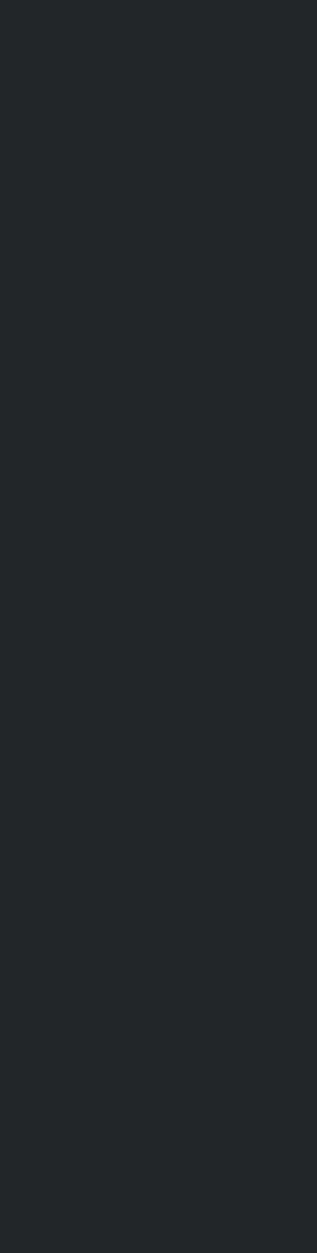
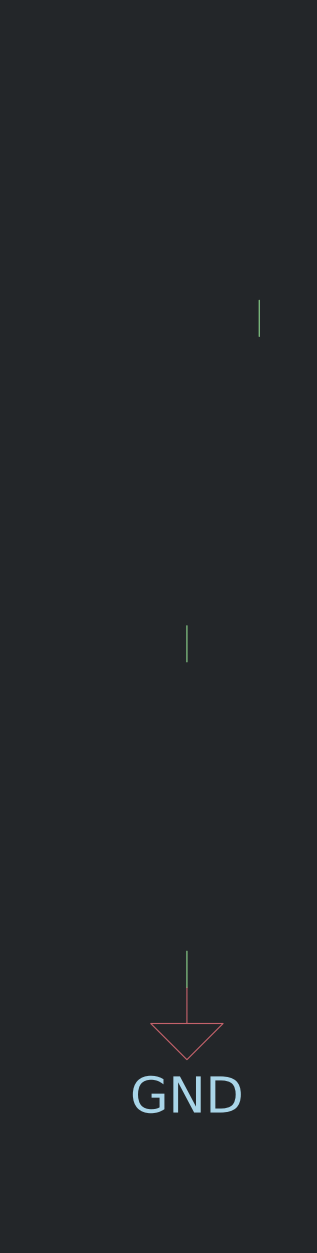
wire: none -> (259, 300) (259, 336)
wire: none -> (186, 625) (186, 661)
wire: none -> (186, 951) (186, 987)
power symbol: none -> GND (186, 1023)

